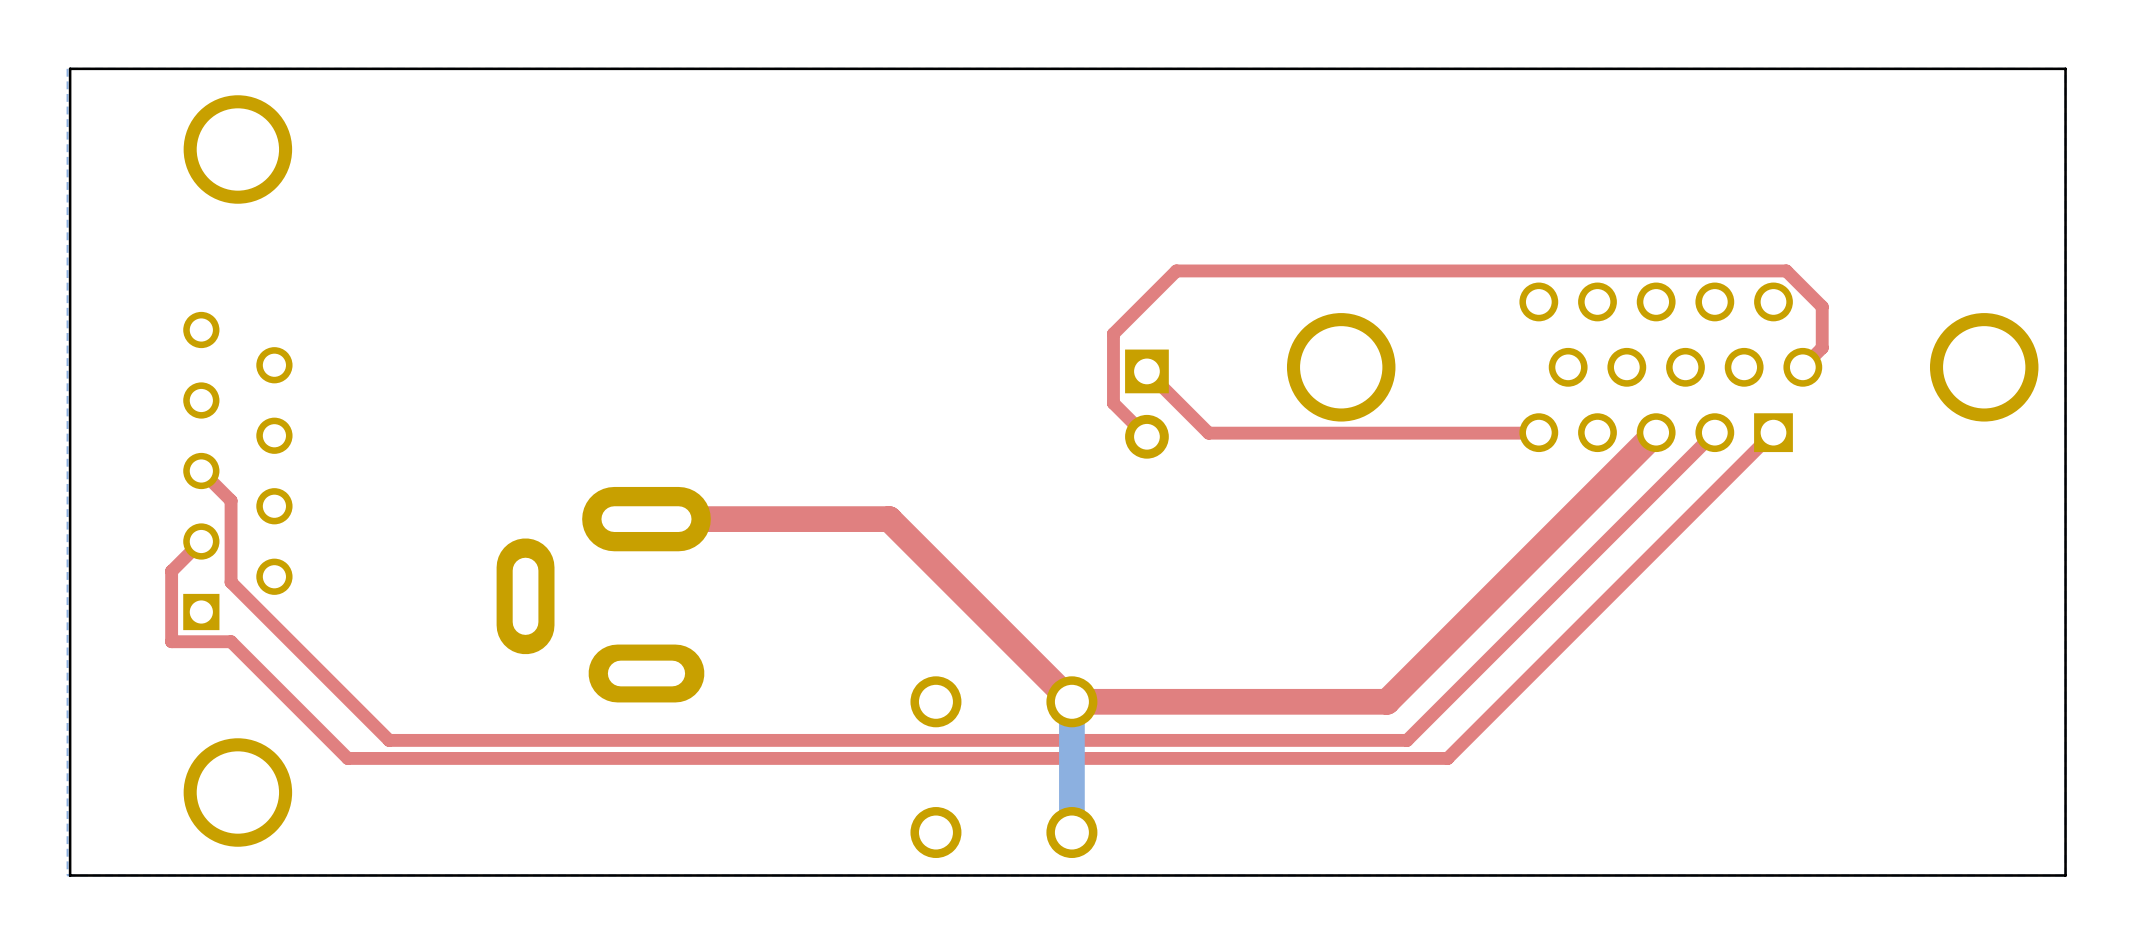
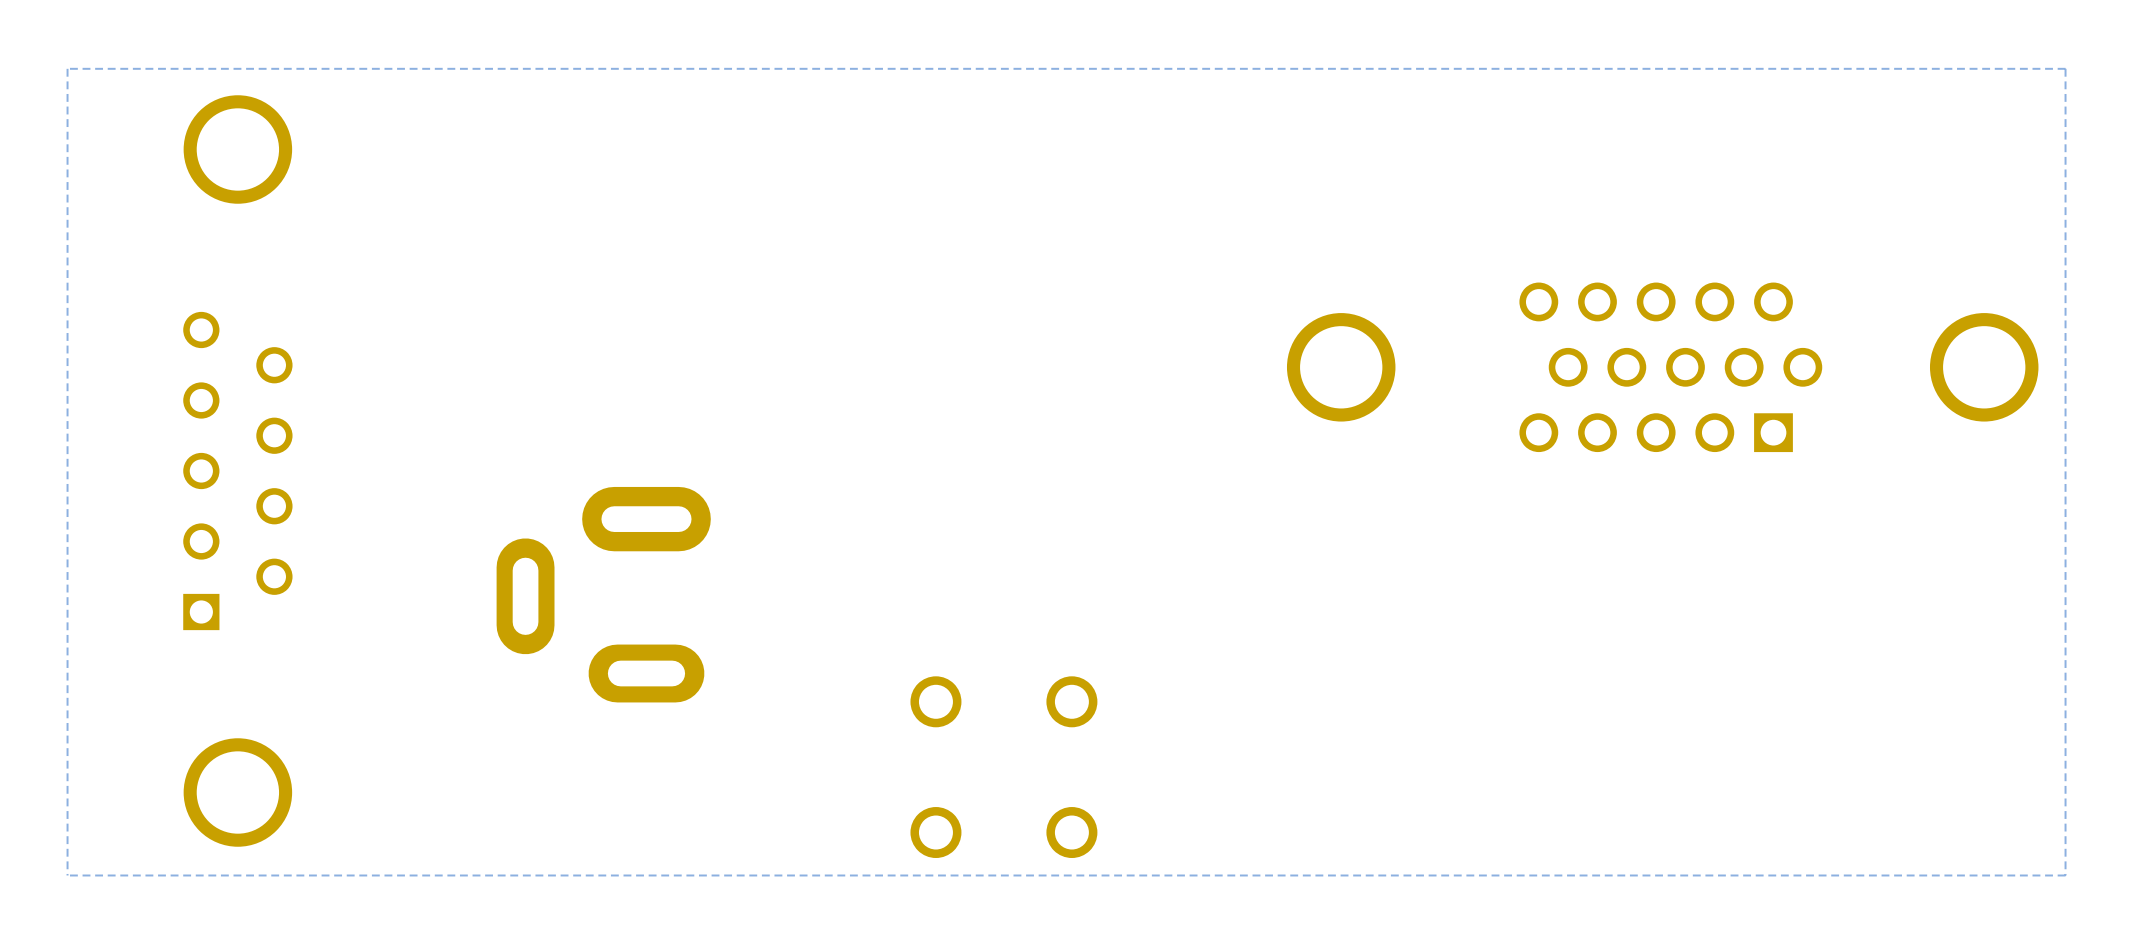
board edge: (2065, 68) (70, 68) (70, 875) (2065, 875) (2065, 68) -> none
top track: (1802, 367) (1822, 347) (1822, 306) (1786, 270) (1176, 270) (1113, 333) (1113, 403) (1146, 436) -> none
top track: (1146, 371) (1208, 433) (1538, 432) -> none
part: (1146, 404) -> none
top track: (1656, 432) (1387, 701) (1071, 701) (889, 519) (646, 519) -> none
top track: (1714, 432) (1407, 740) (389, 740) (231, 582) (231, 500) (201, 471) -> none
top track: (1781, 432) (1773, 432) (1447, 758) (347, 758) (231, 641) (171, 641) (171, 571) (201, 541) -> none
bottom track: (1071, 701) (1071, 832) -> none

